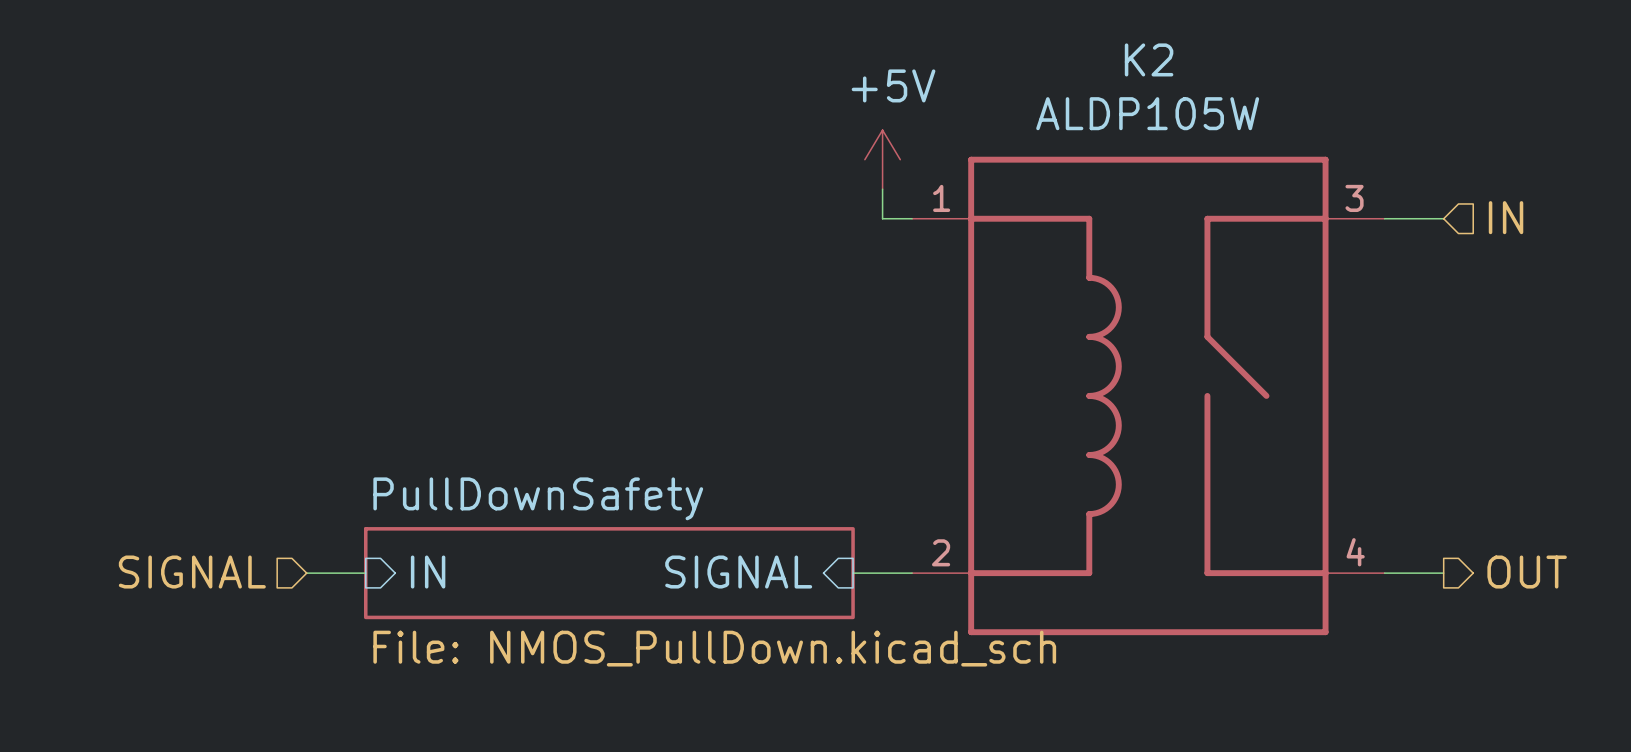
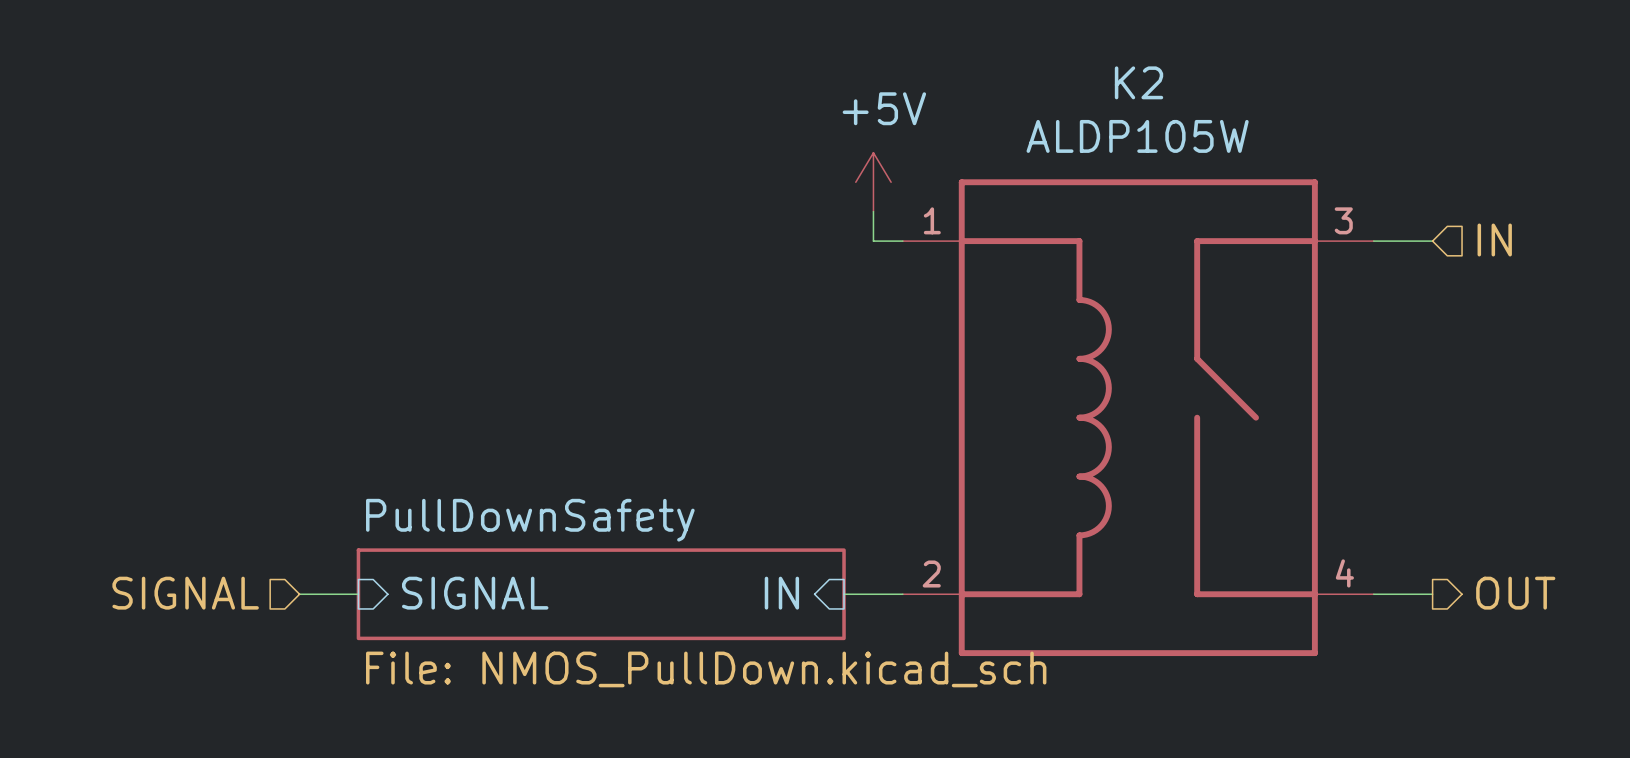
sheet pin: IN (428, 572) -> SIGNAL (475, 593)
sheet pin: SIGNAL (738, 572) -> IN (781, 593)

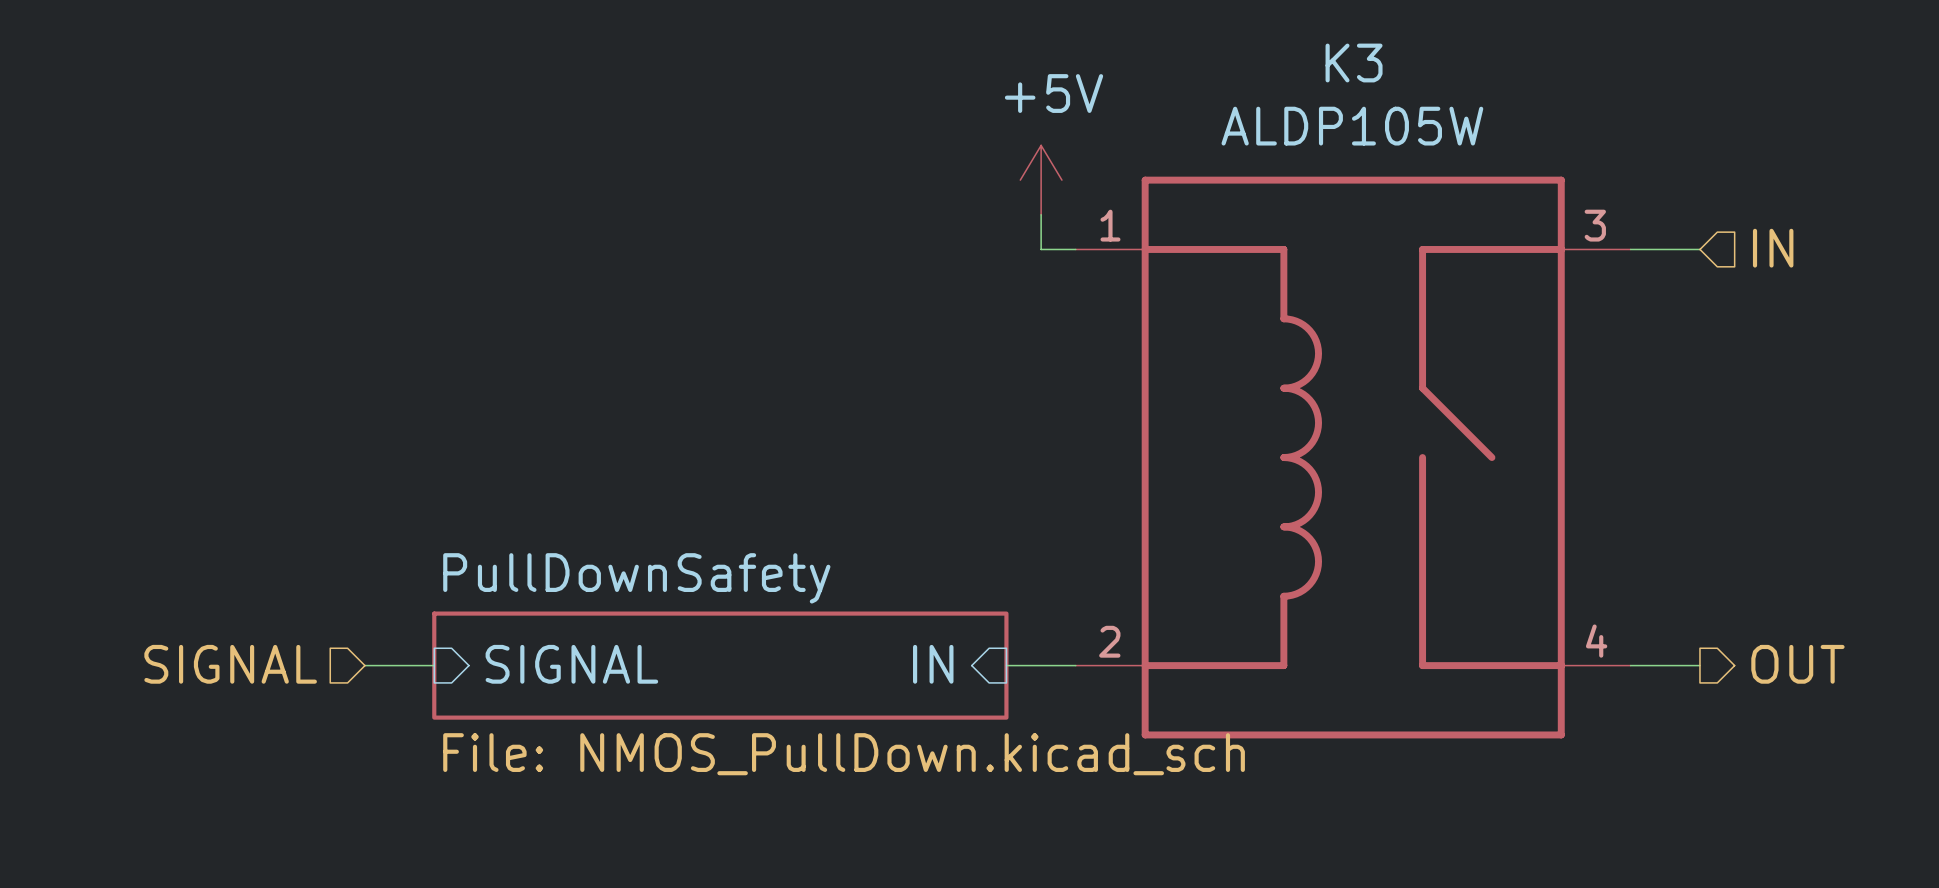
K2 name: K2 (1139, 82) -> K3 (1354, 63)

